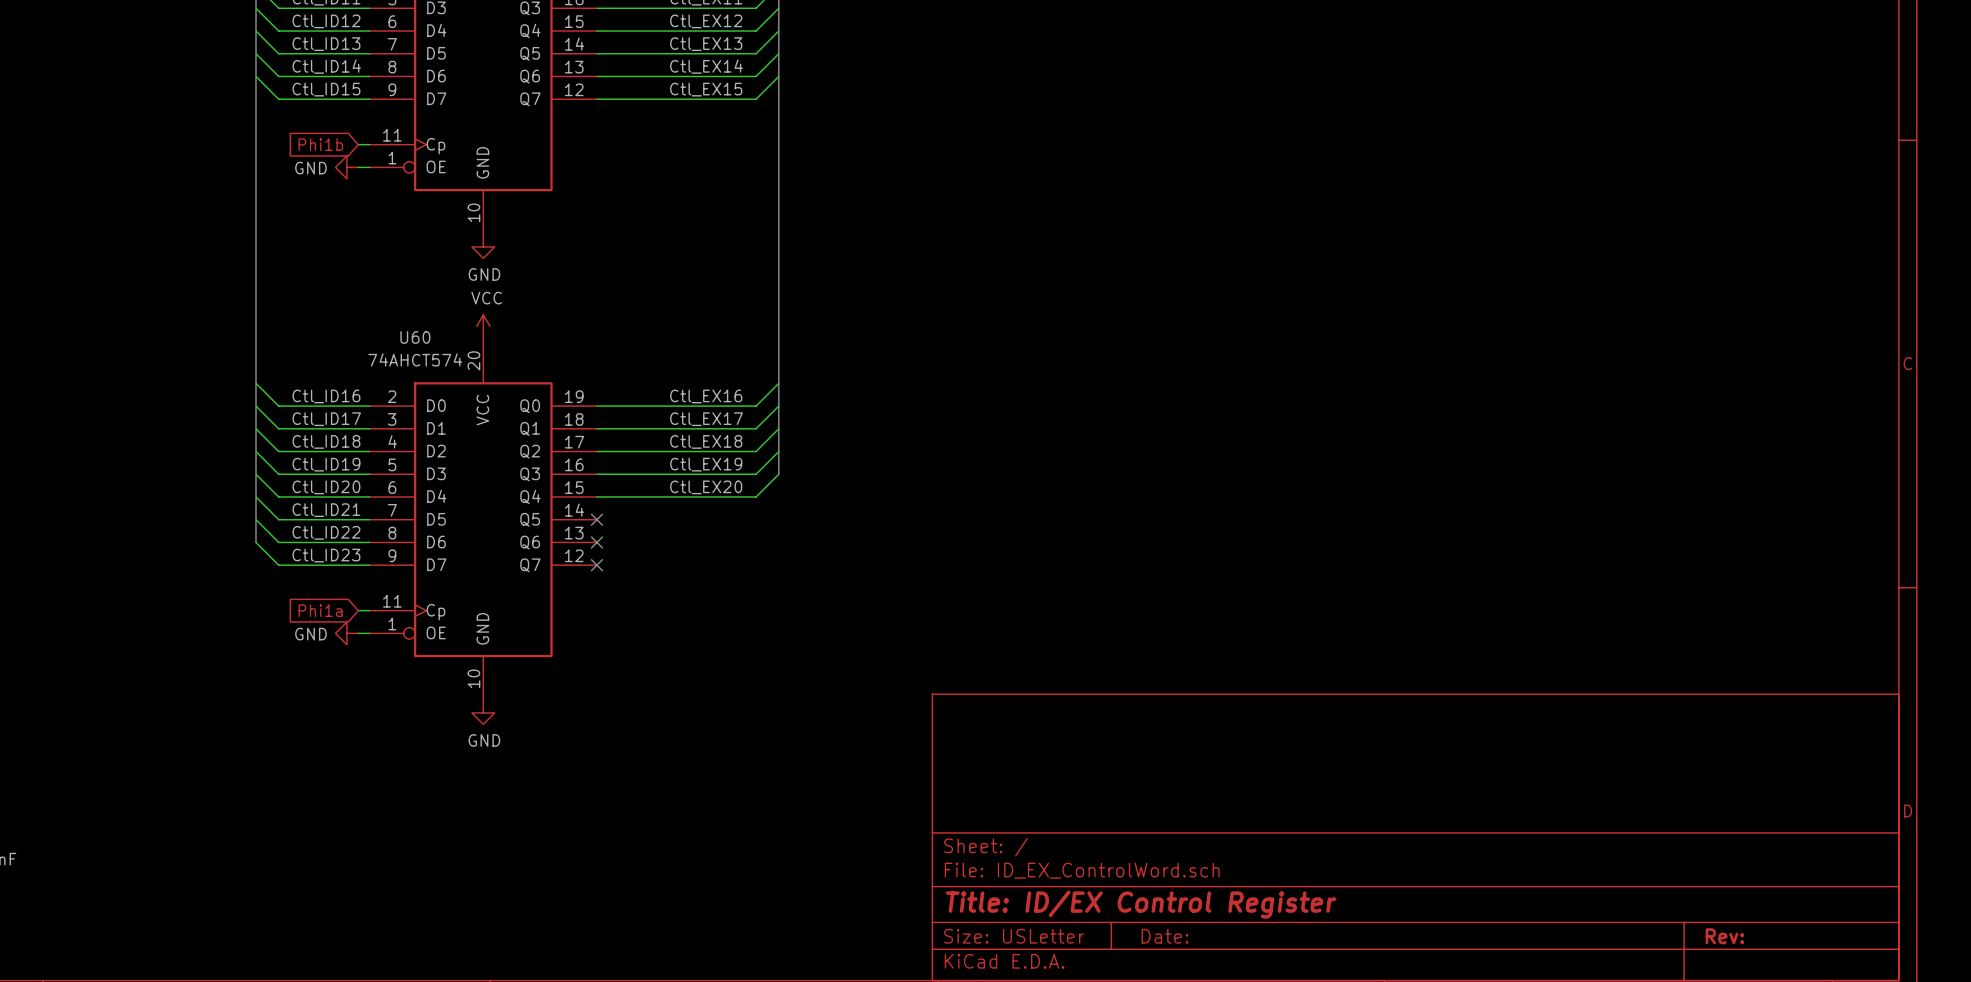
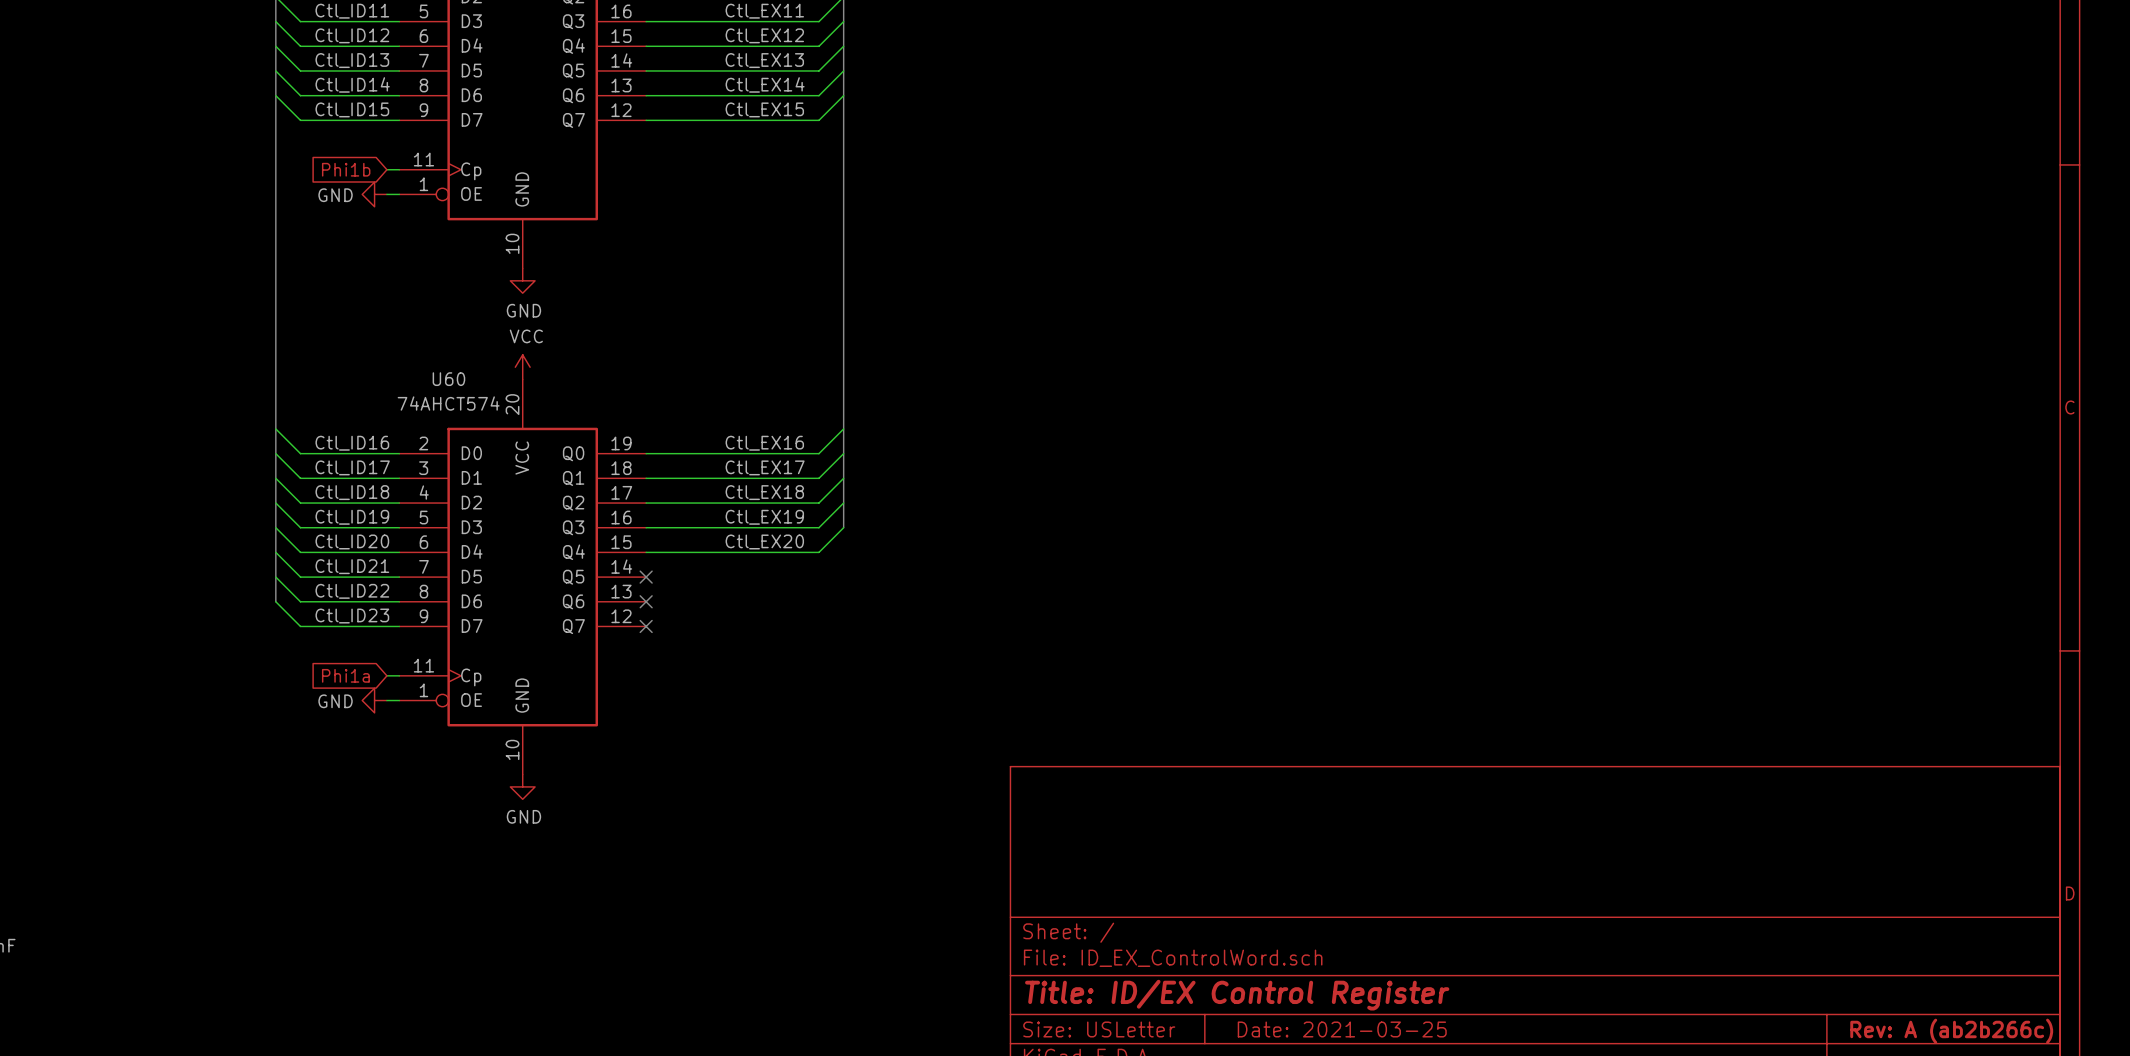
title block: Date: (1165, 936) -> Date: 2021-03-25 (1342, 1029)
title block: Rev: (1724, 936) -> Rev: A (ab2b266c) (1951, 1031)

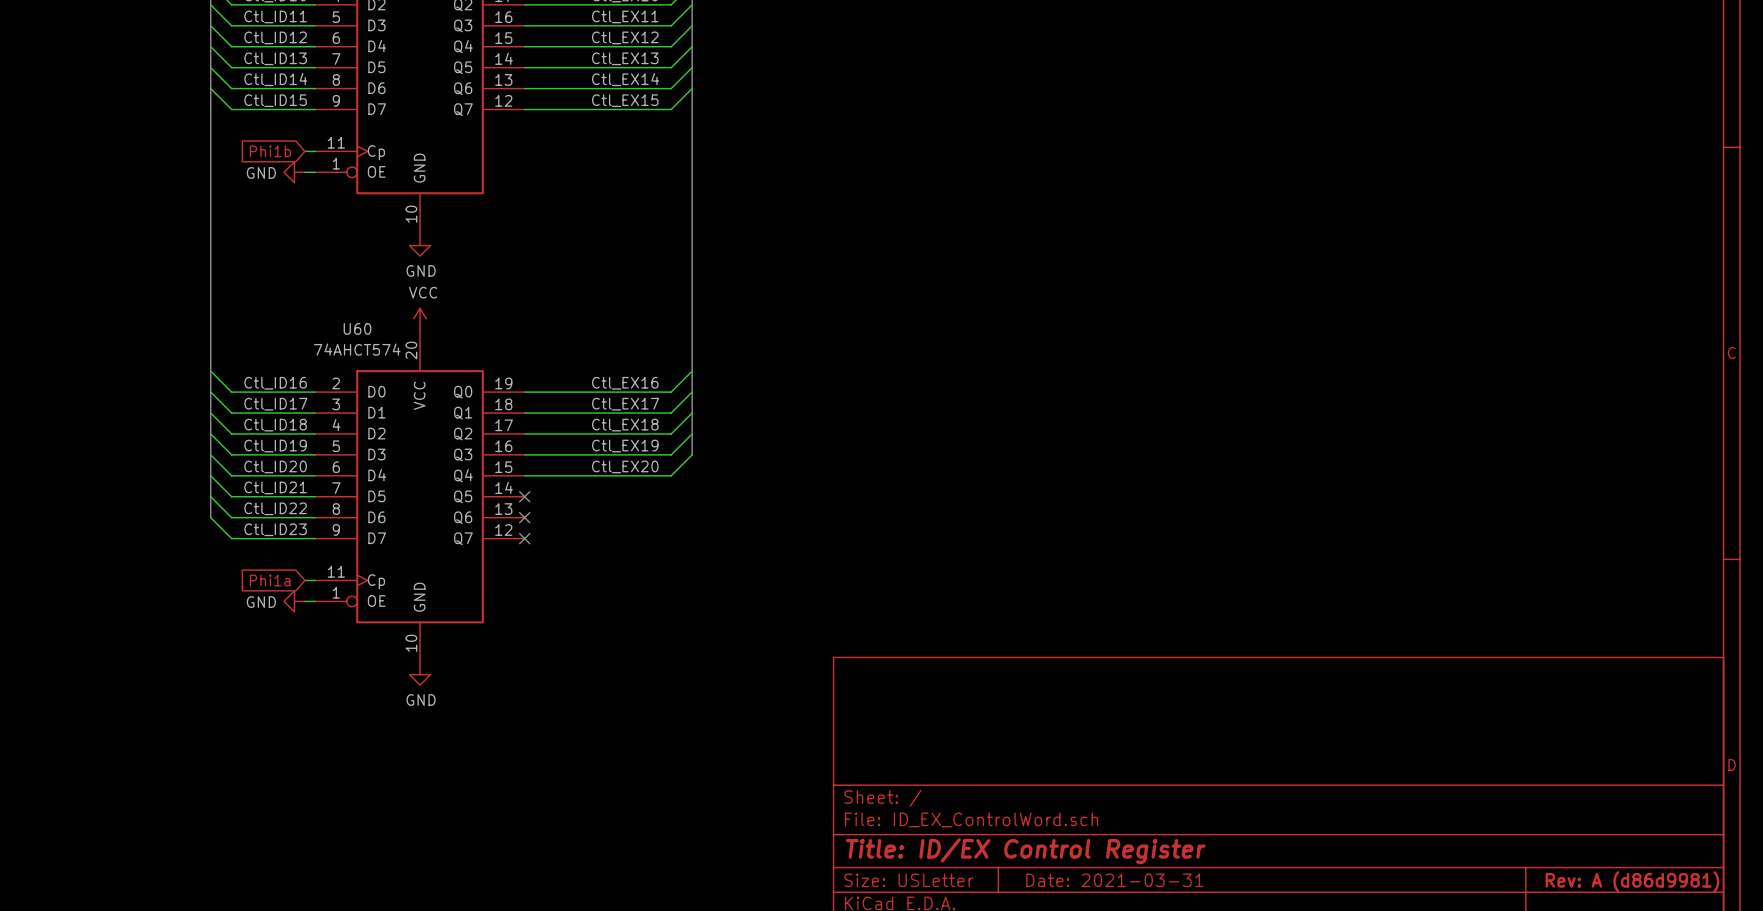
title block: Date: 2021-03-25 (1342, 1029) -> Date: 2021-03-31 (1114, 880)
title block: Rev: A (ab2b266c) (1951, 1031) -> Rev: A (d86d9981) (1632, 881)

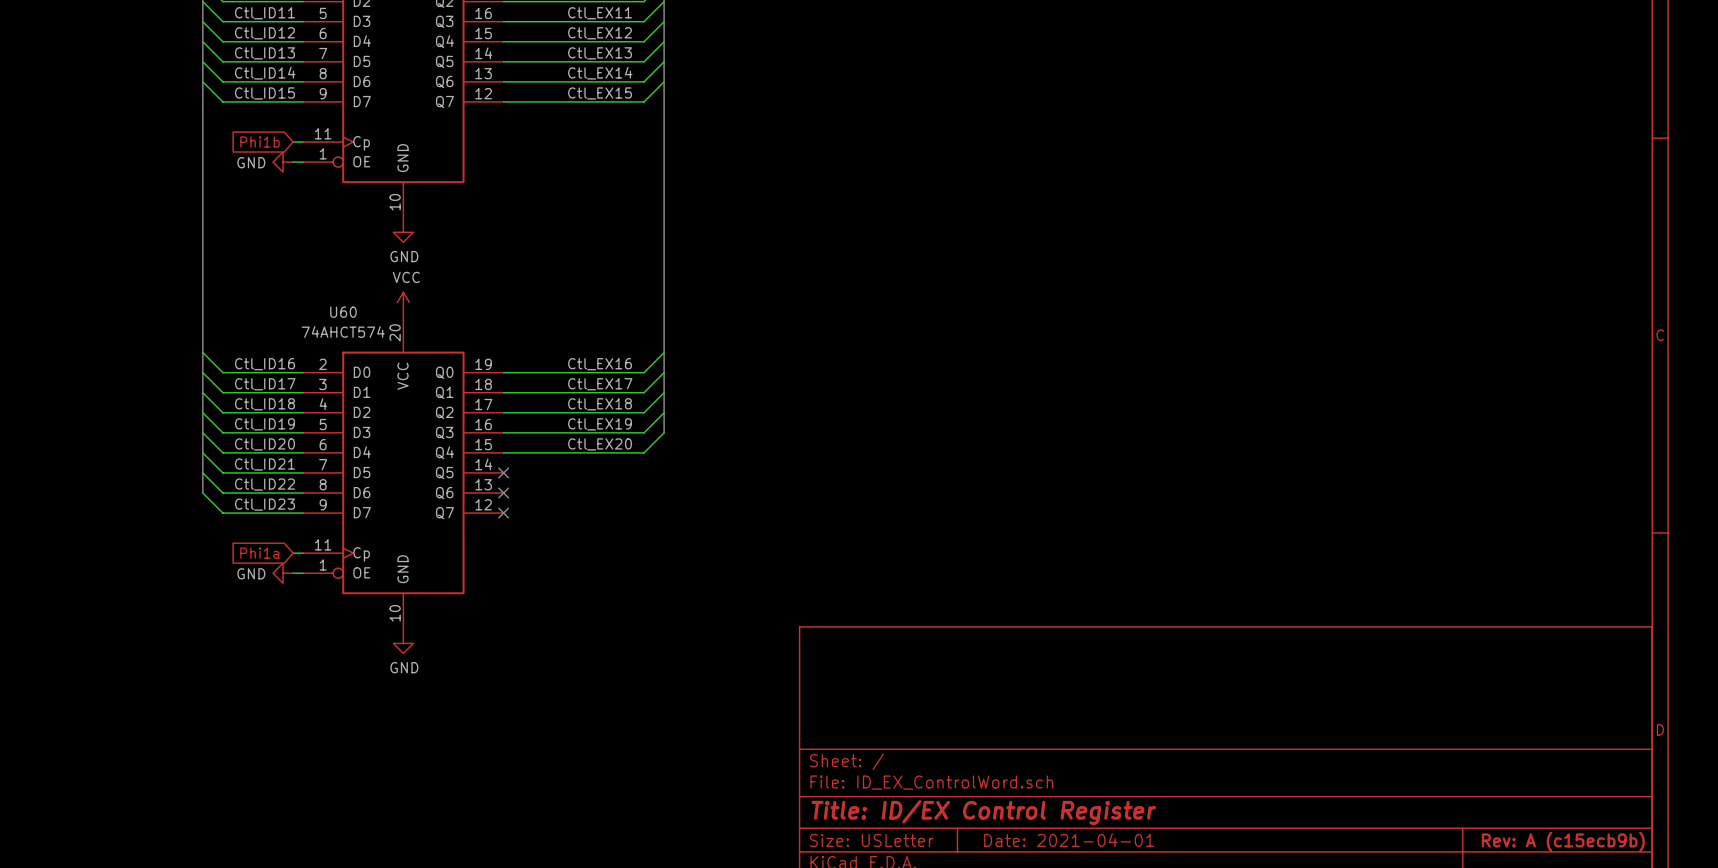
title block: Date: 2021-03-31 (1114, 880) -> Date: 2021-04-01 (1069, 840)
title block: Rev: A (d86d9981) (1632, 881) -> Rev: A (c15ecb9b) (1563, 841)

